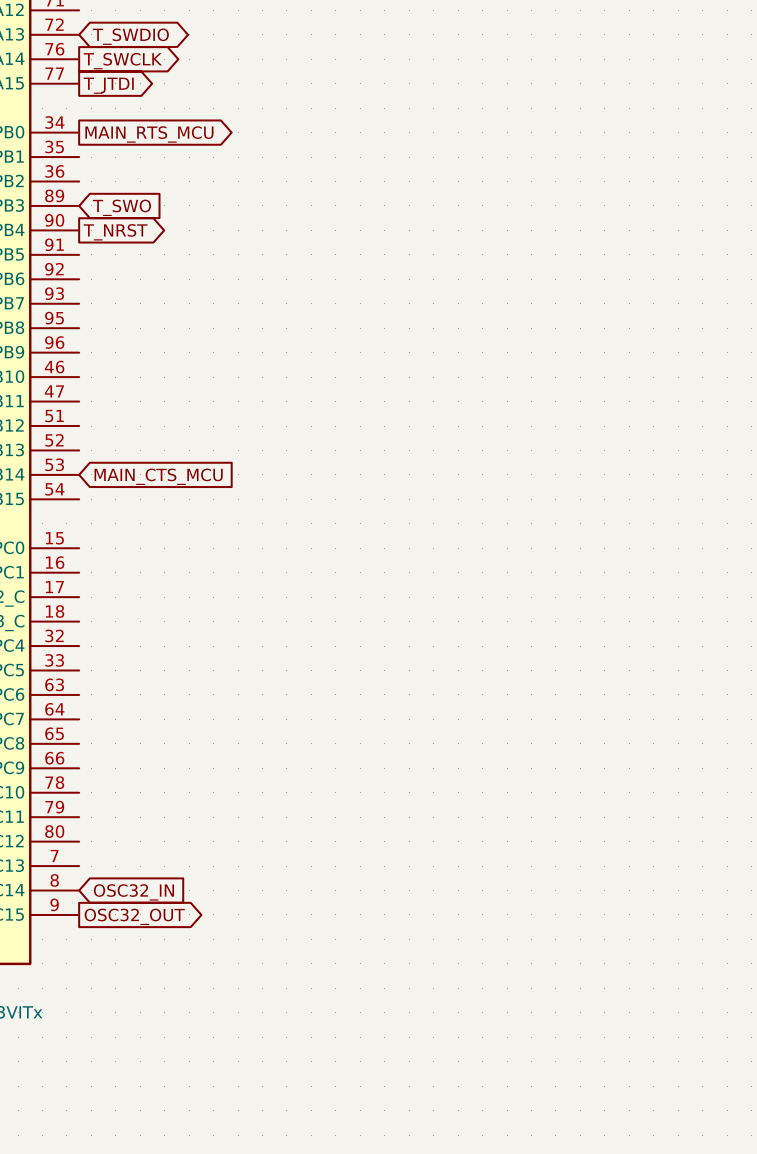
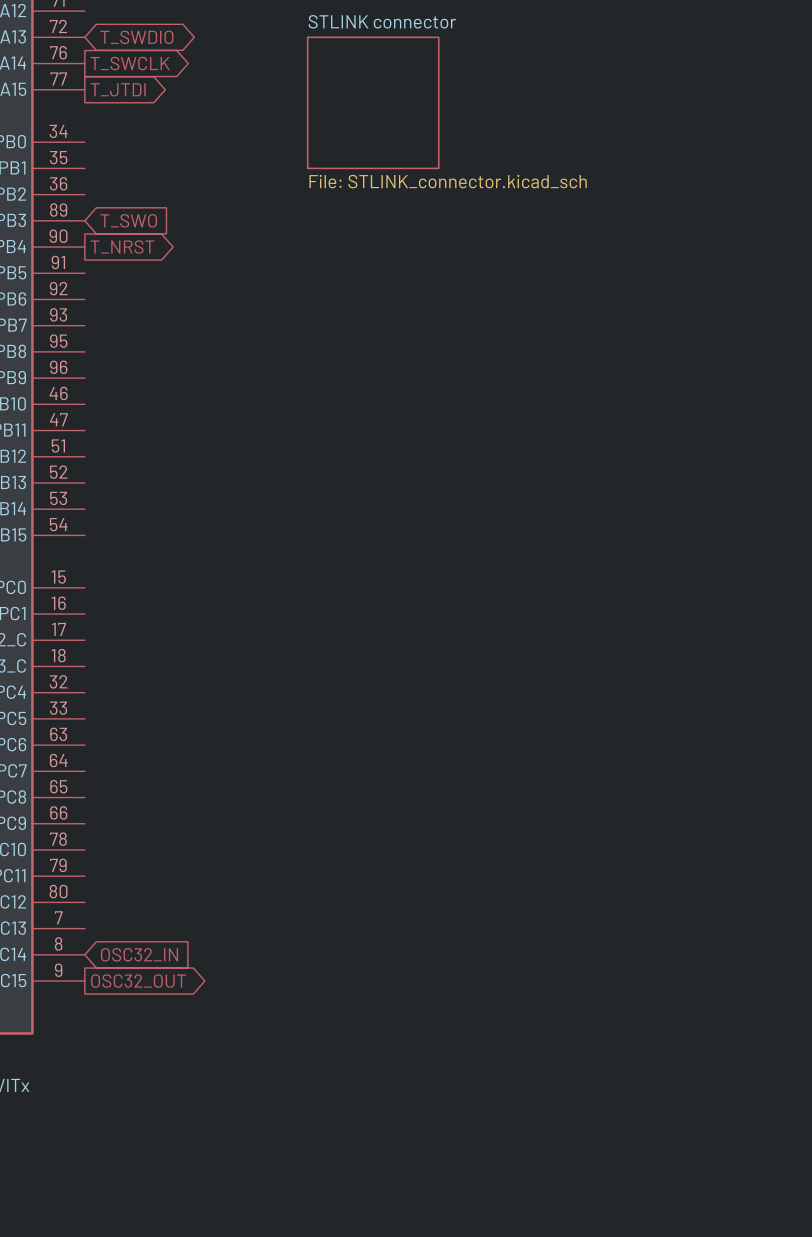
sheet STLINK connector: none -> File: STLINK_connector.kicad_sch (373, 102)
global label: MAIN_RTS_MCU (149, 134) -> none
global label: MAIN_CTS_MCU (158, 476) -> none

